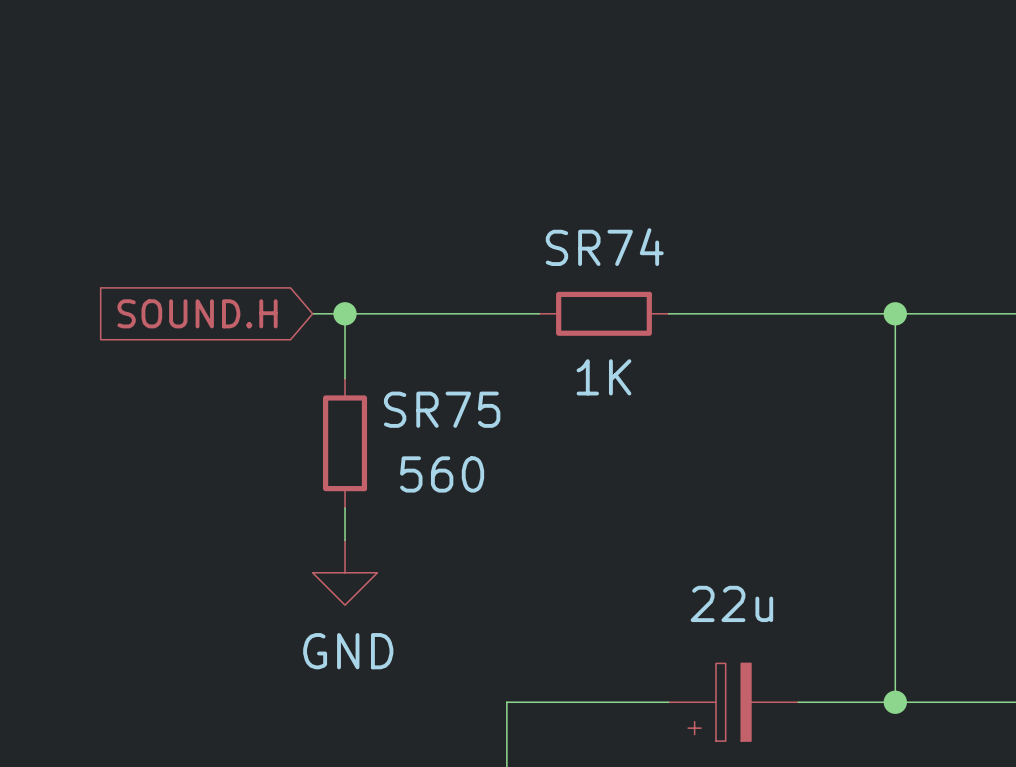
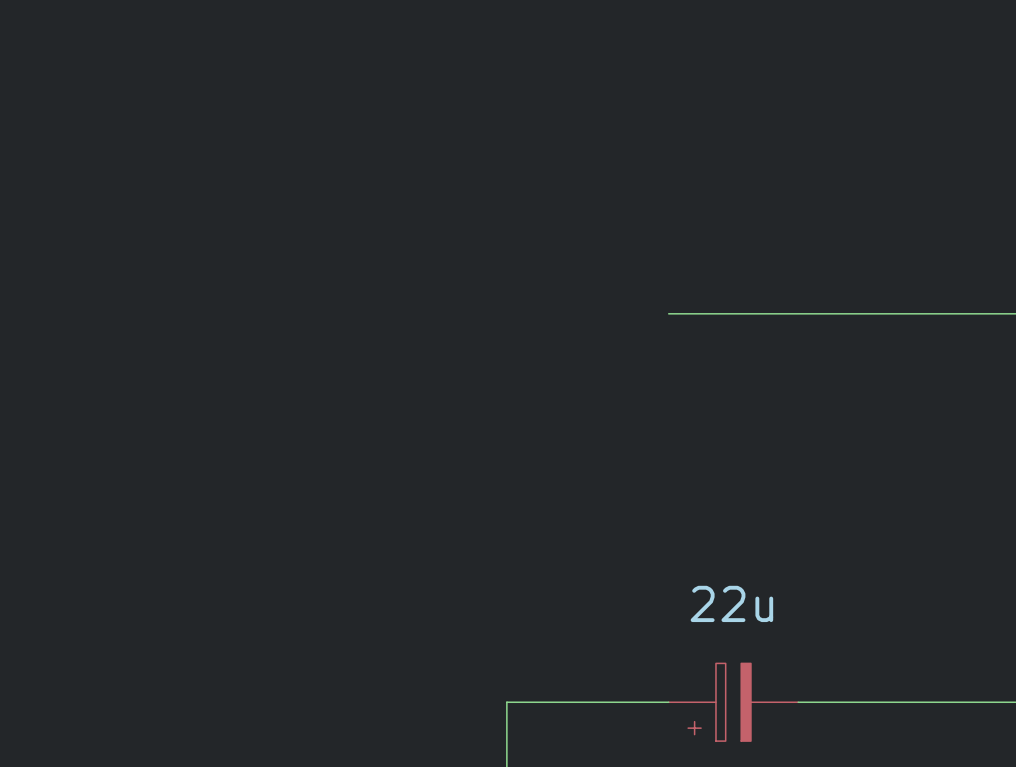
global label: SOUND.H (197, 313) -> none
wire: (312, 313) (539, 313) -> none
wire: (345, 313) (345, 378) -> none
junction: (345, 313) -> none
SR74: 1K (603, 313) -> none
wire: (895, 313) (895, 702) -> none
junction: (895, 313) -> none
SR75: 560 (345, 443) -> none
wire: (345, 508) (345, 540) -> none
power symbol: GND (345, 572) -> none
junction: (895, 702) -> none

